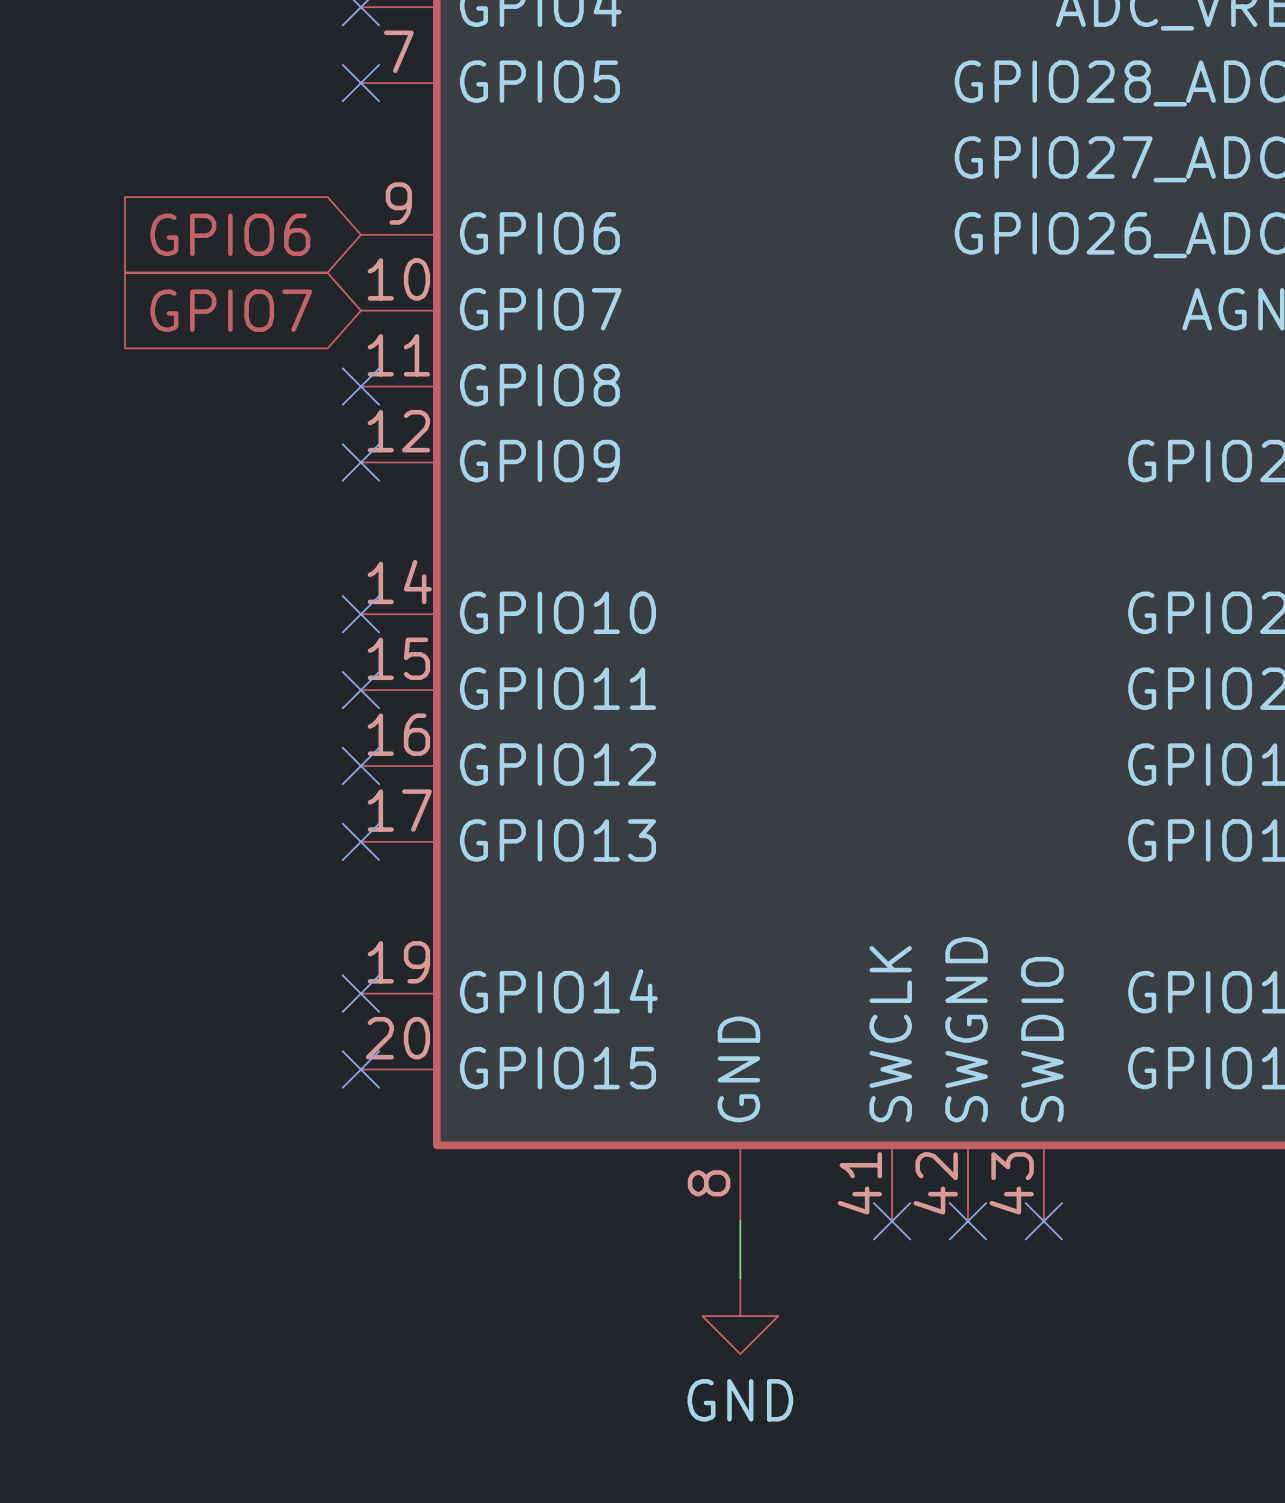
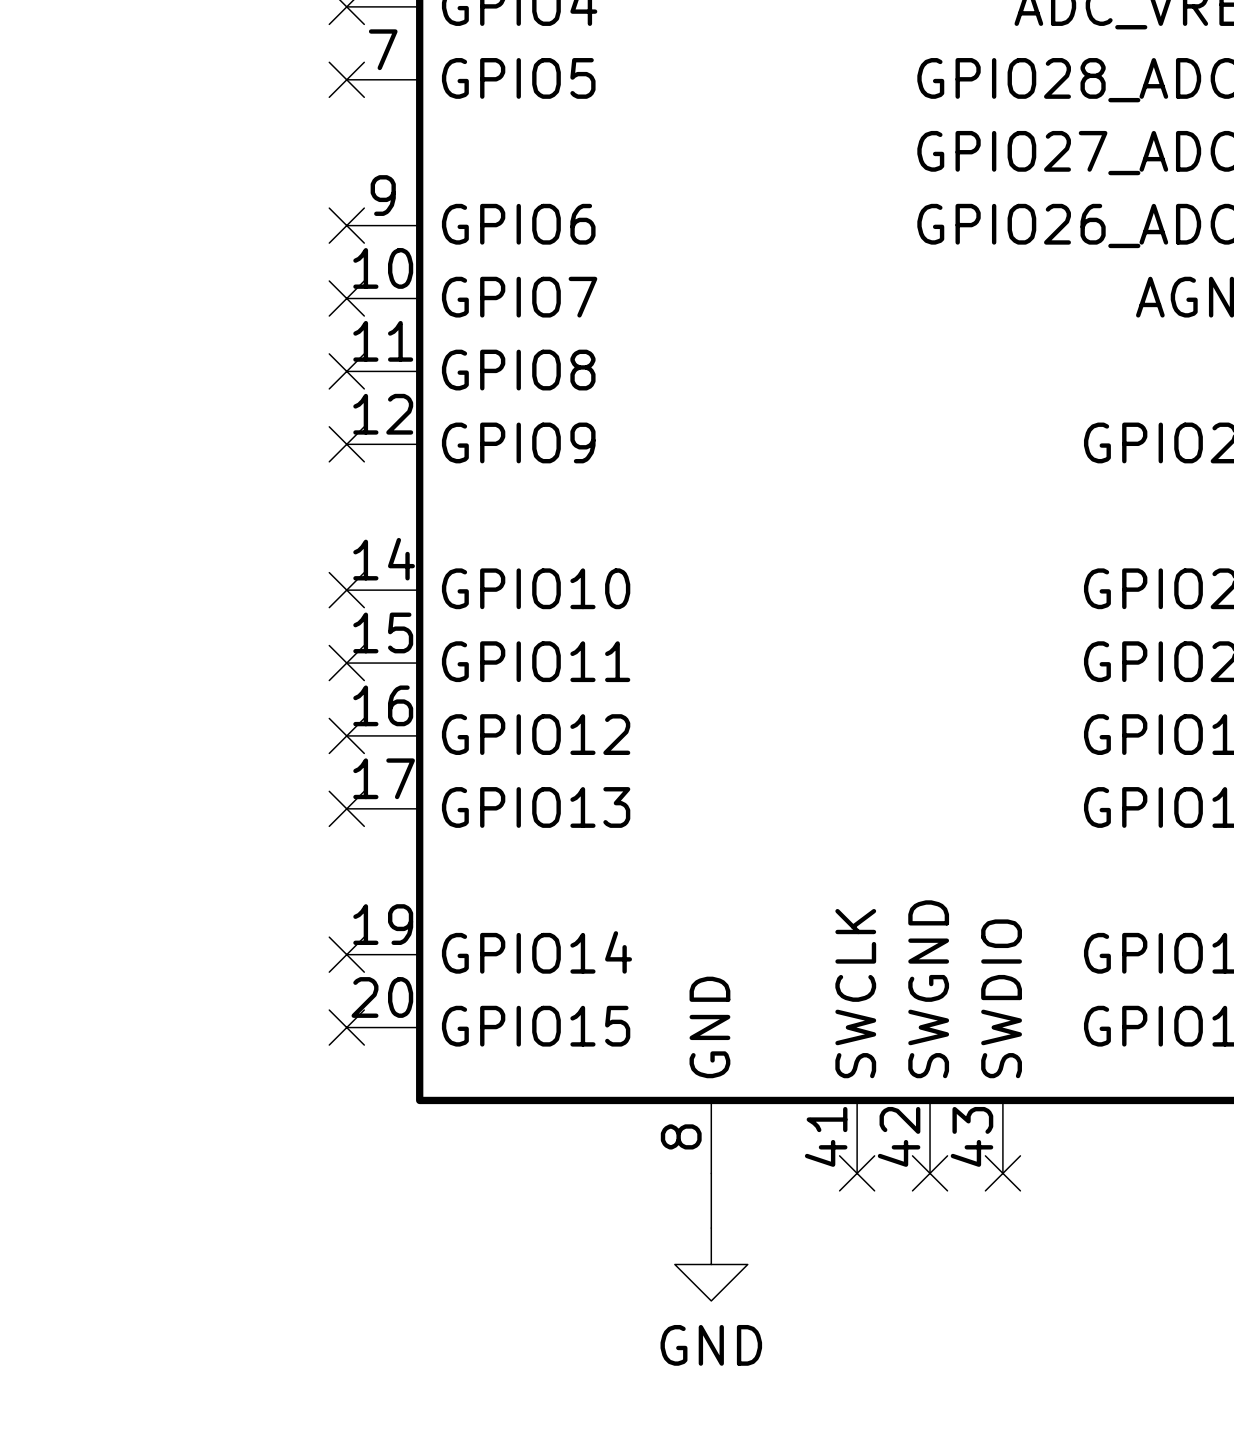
global label: GPIO6 (230, 234) -> none
no-connect mark: none -> (346, 225)
global label: GPIO7 (231, 310) -> none
no-connect mark: none -> (346, 298)

